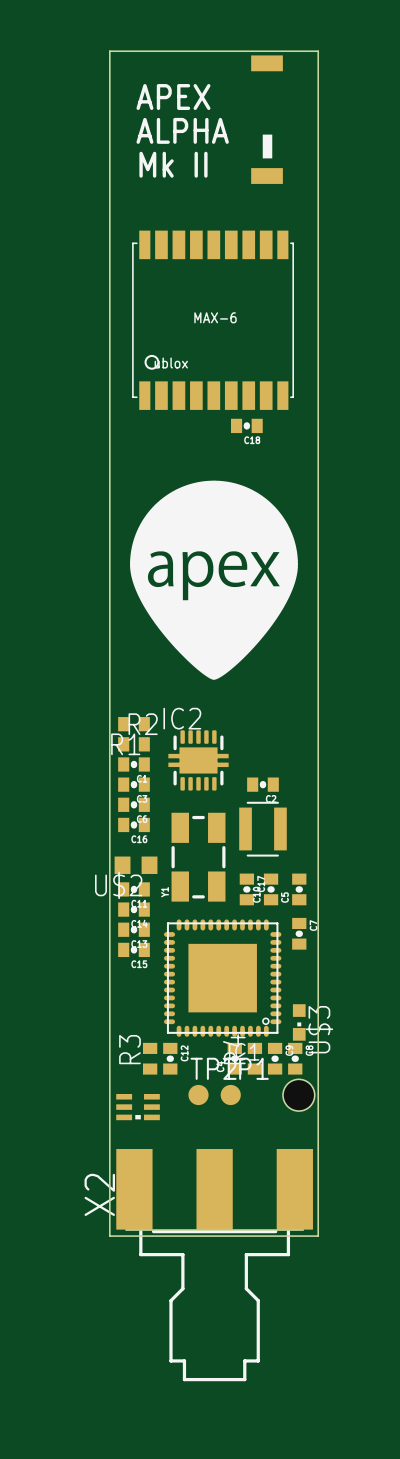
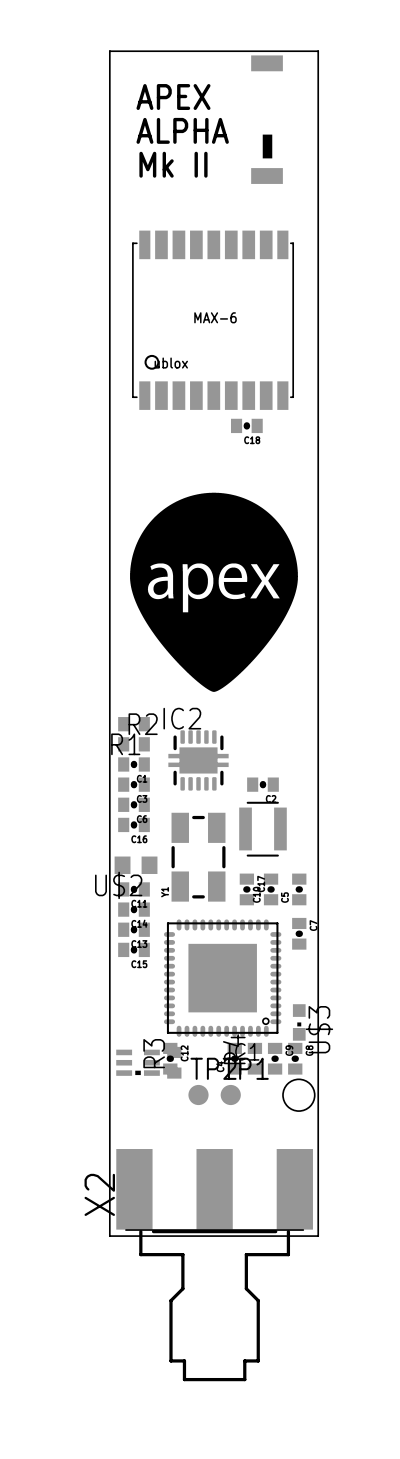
drawing position: (214, 580) -> (214, 592)
R3 position: (150, 1058) -> (174, 1062)
part position: (138, 1107) -> (138, 1062)

